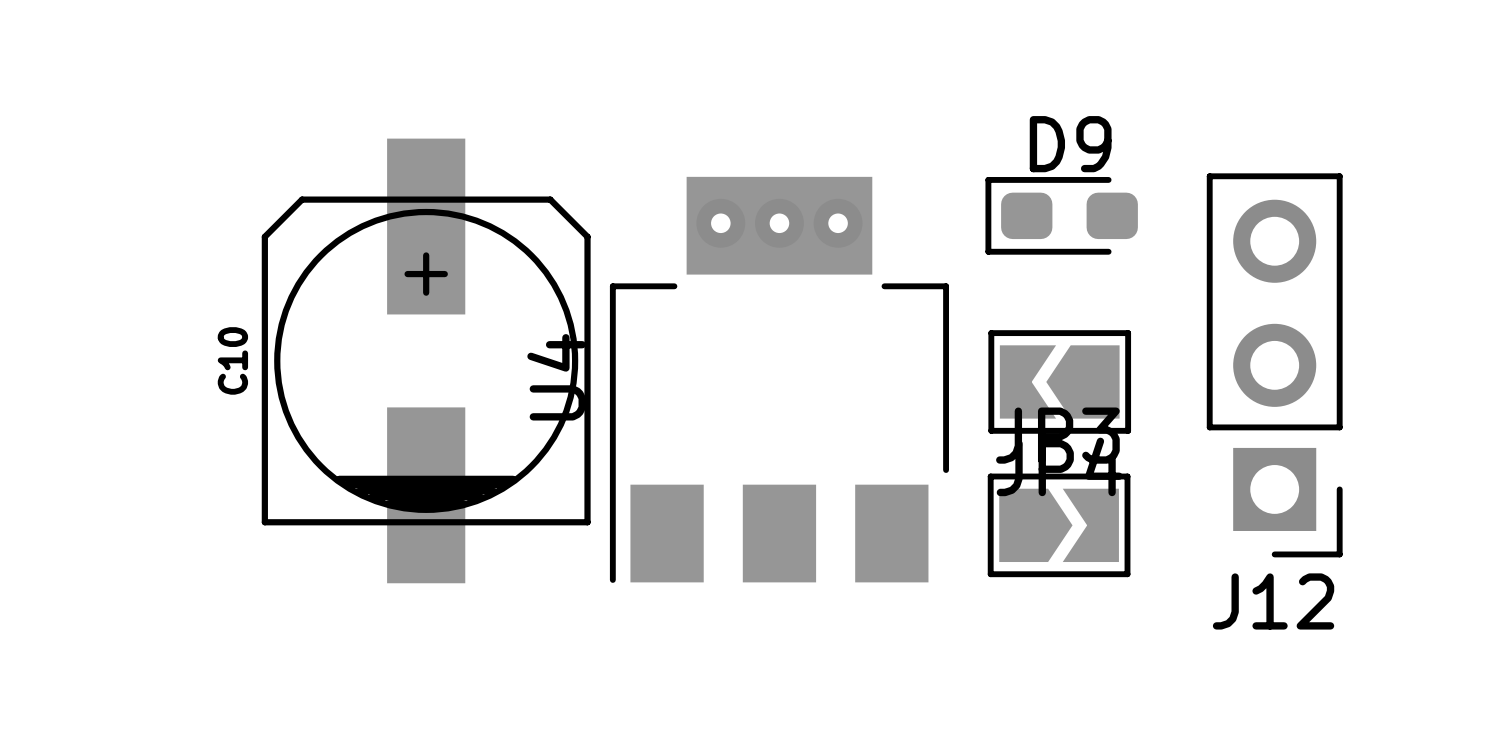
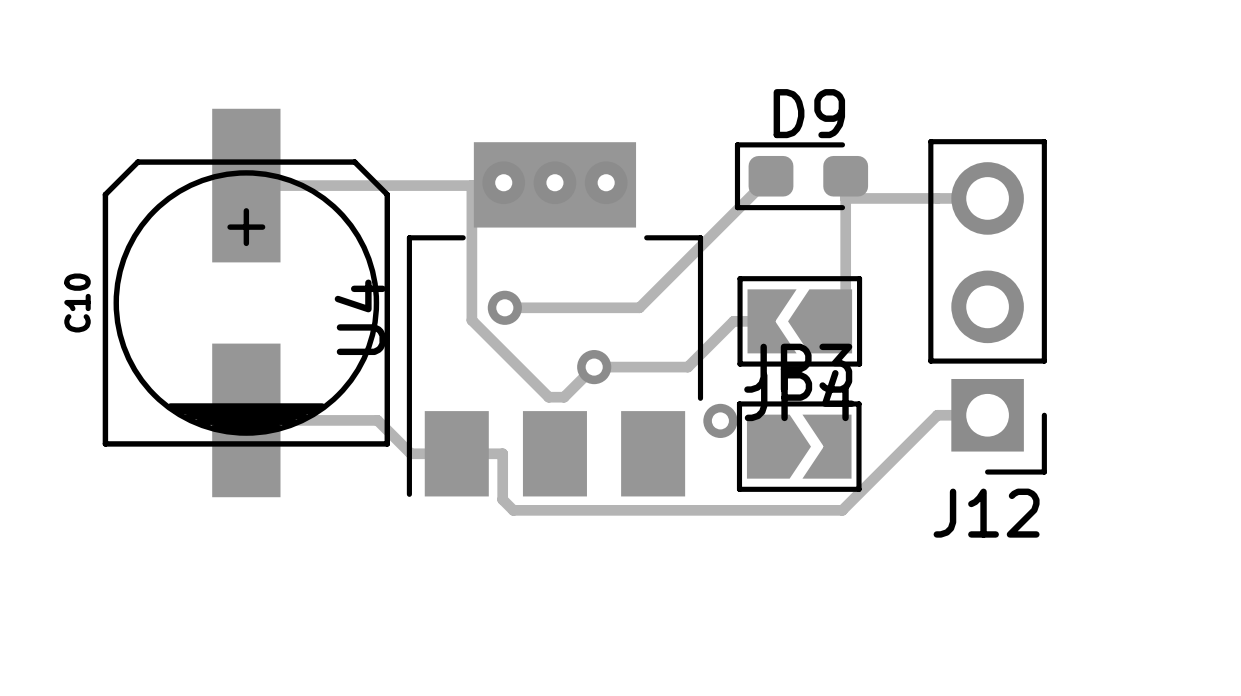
track: none -> (770, 176) (639, 307) (504, 307)
track: none -> (845, 176) (845, 306) (830, 321)
track: none -> (606, 182) (503, 182) (500, 185) (246, 185)
track: none -> (471, 185) (471, 320) (548, 397) (564, 397) (594, 367) (687, 367) (733, 321) (768, 321)
track: none -> (845, 198) (987, 198)
via: none -> (504, 307)
via: none -> (594, 367)
track: none -> (987, 415) (937, 415) (842, 510) (513, 510) (502, 499) (502, 453) (410, 453) (377, 420) (246, 420)
via: none -> (720, 420)

